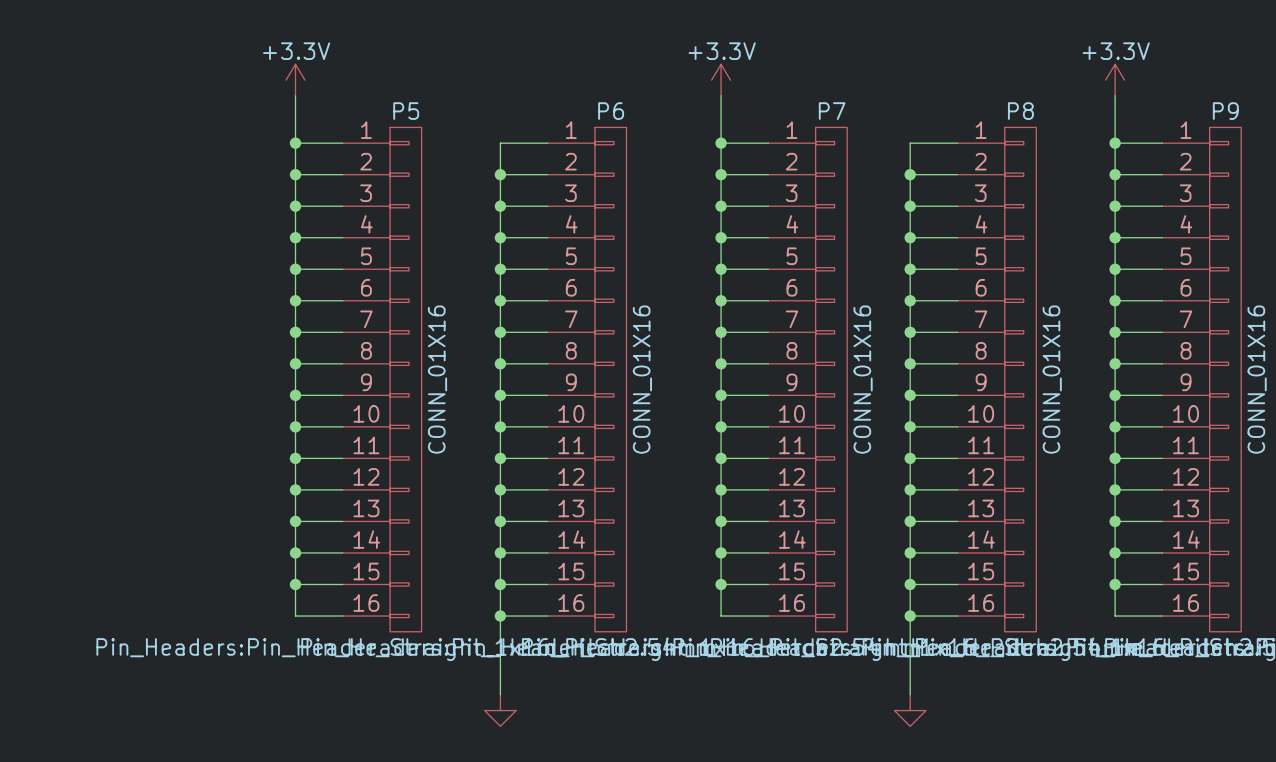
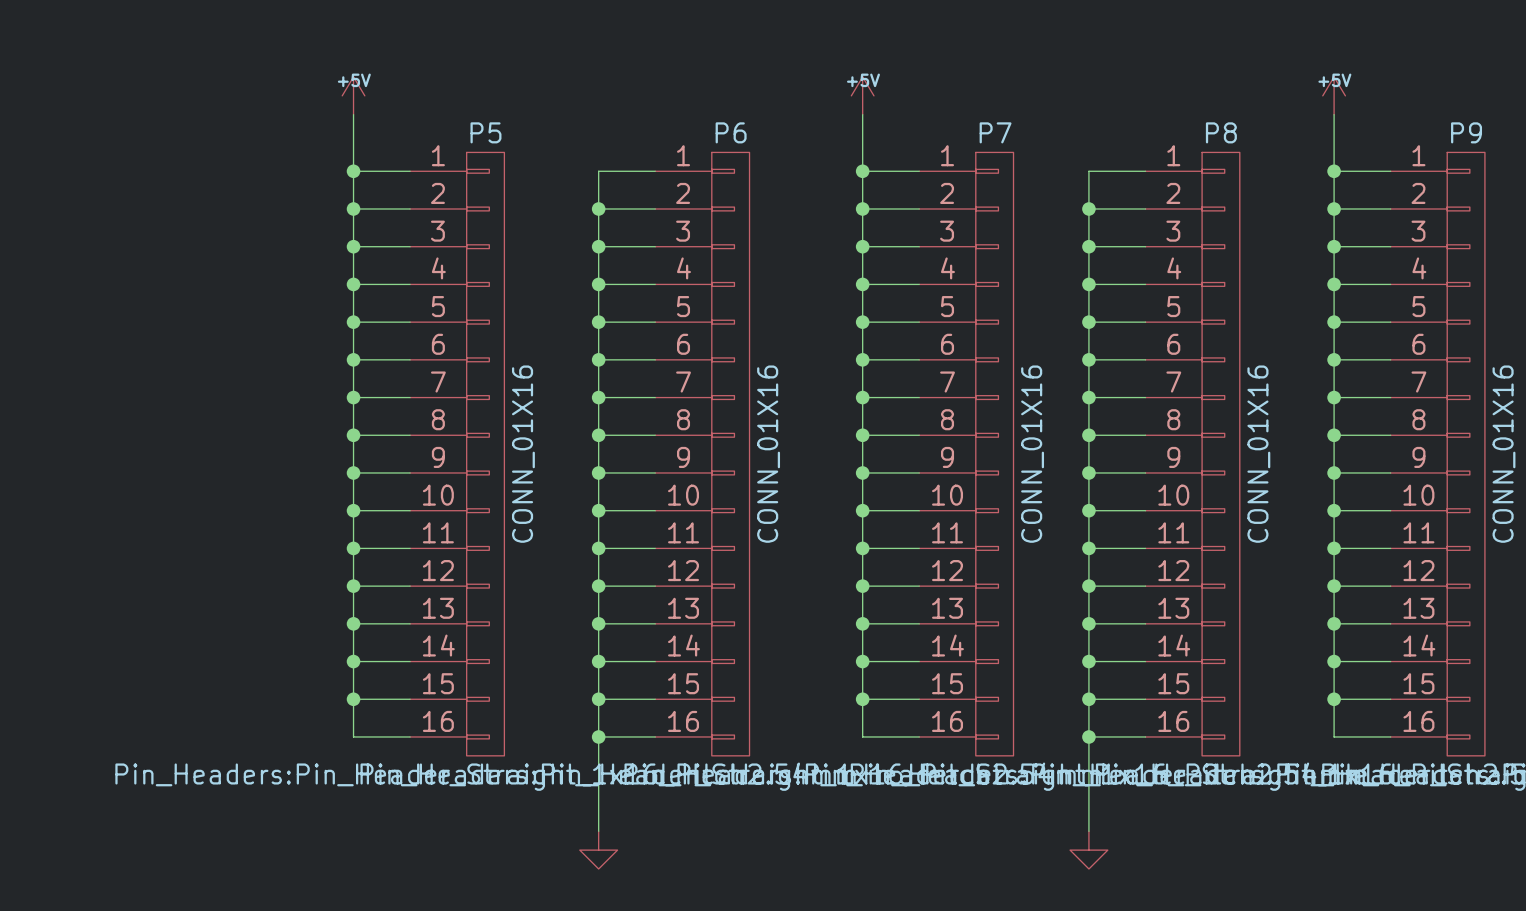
power symbol: +3.3V (295, 80) -> +5V (353, 95)
power symbol: +3.3V (721, 80) -> +5V (862, 95)
power symbol: +3.3V (1115, 80) -> +5V (1334, 95)

